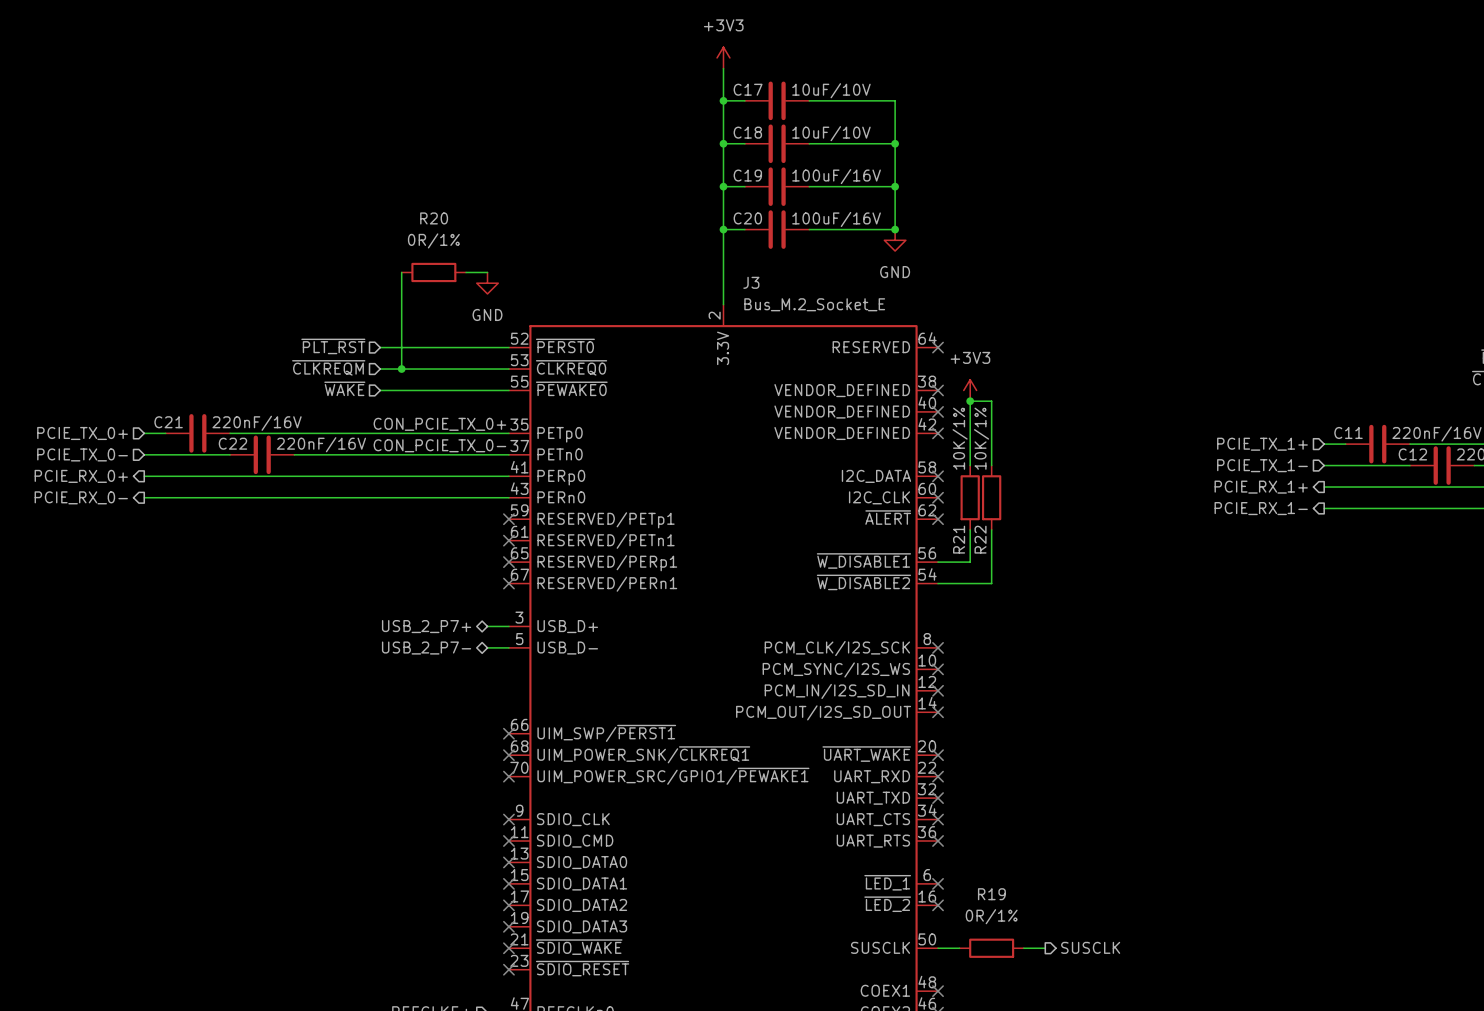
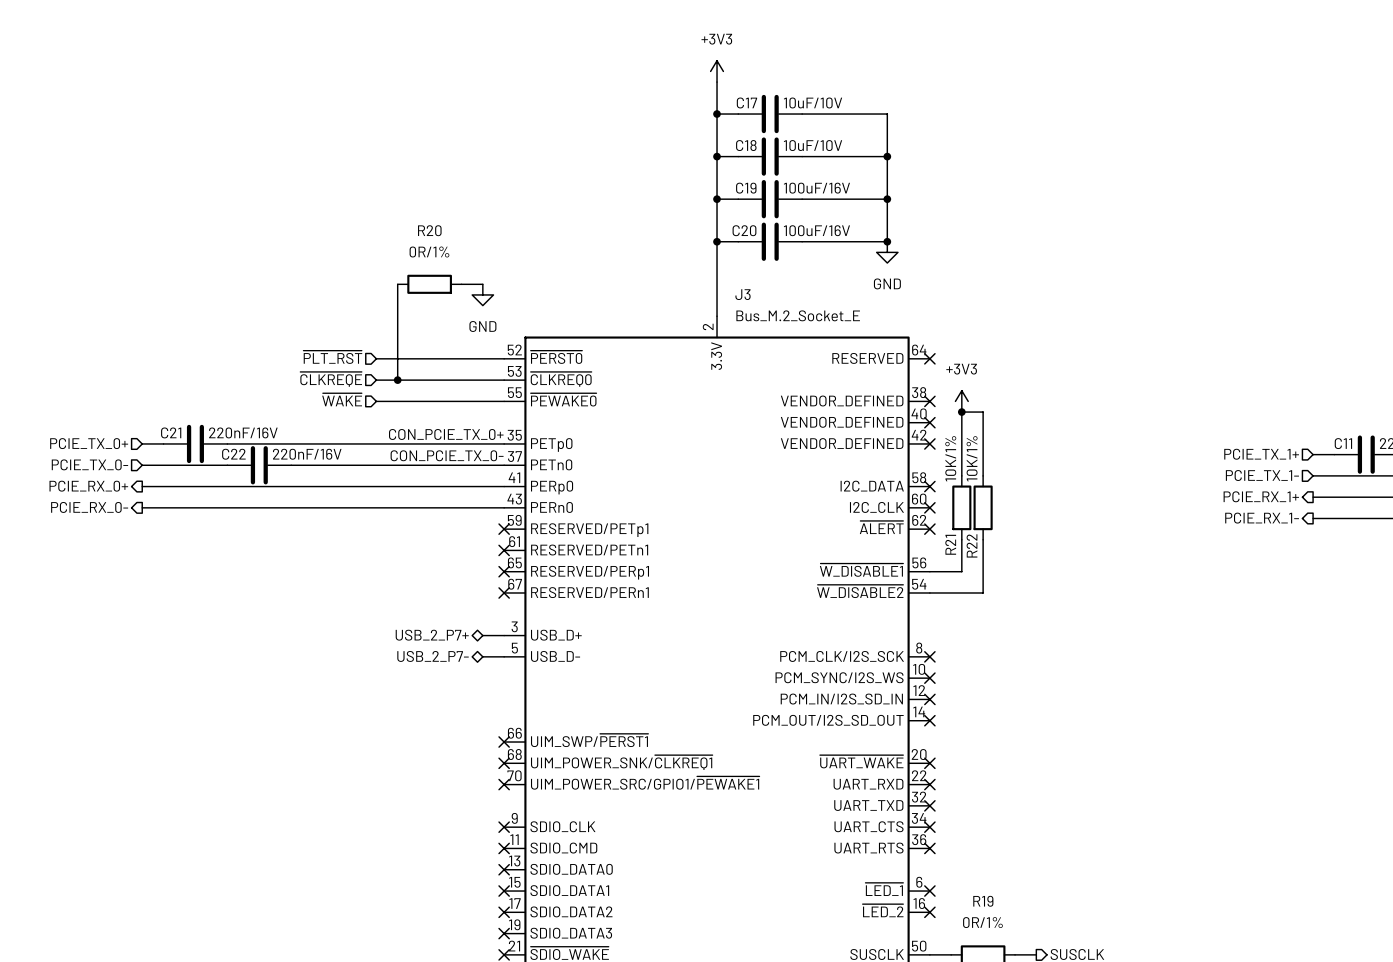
hierarchical label: ~{CLKREQM} (328, 367) -> ~{CLKREQE} (331, 379)

